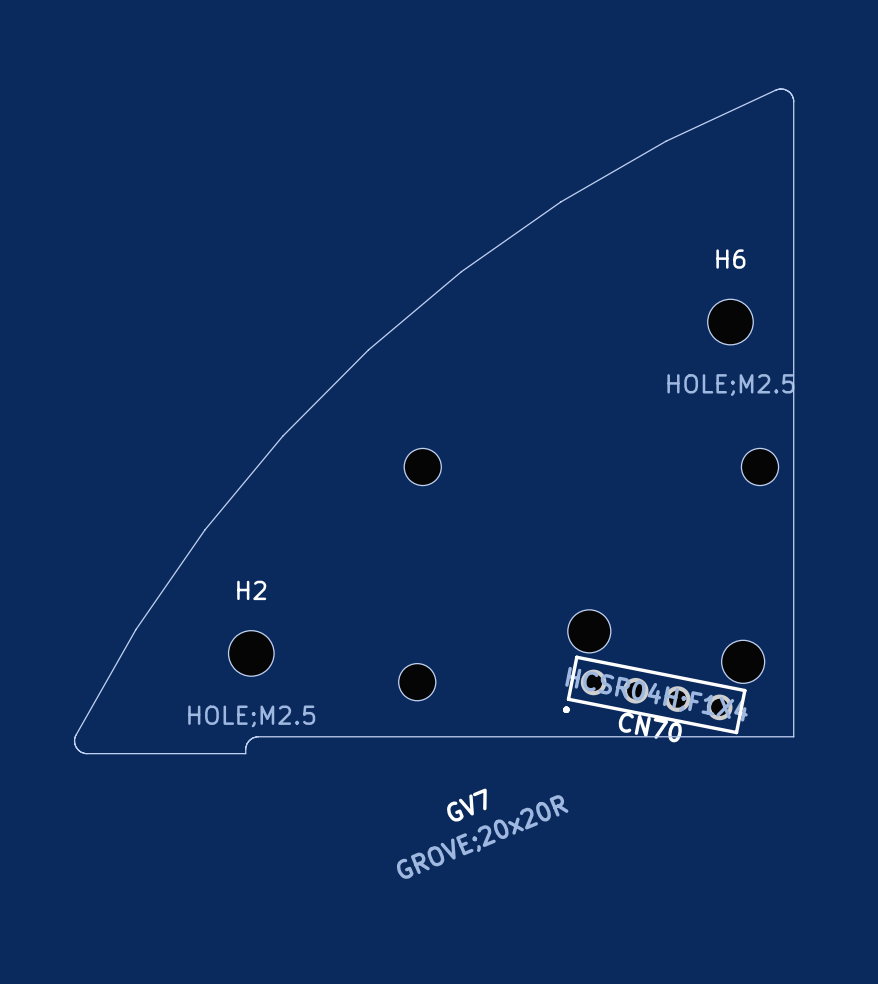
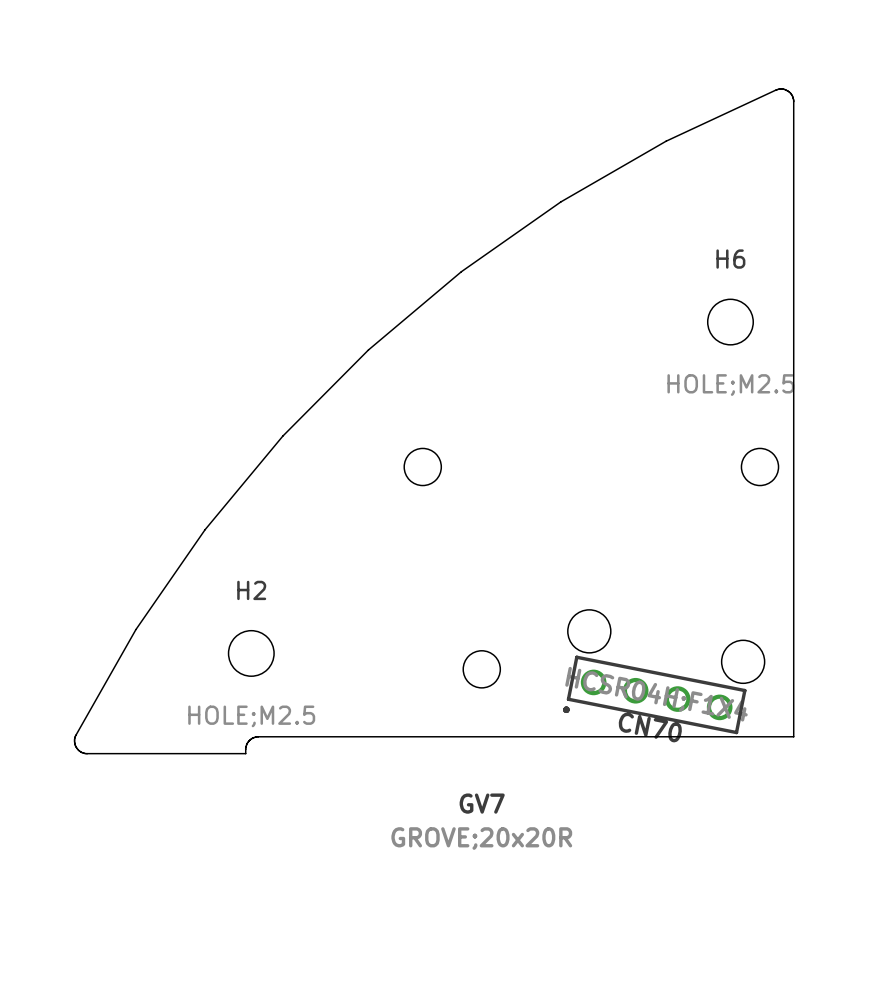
GV7 position: (417, 682) -> (481, 669)
GV7 name rotation: 0° (466, 805) -> 22.5° clockwise (482, 803)
GV7 value rotation: 0° (482, 836) -> 22.5° clockwise (481, 838)

